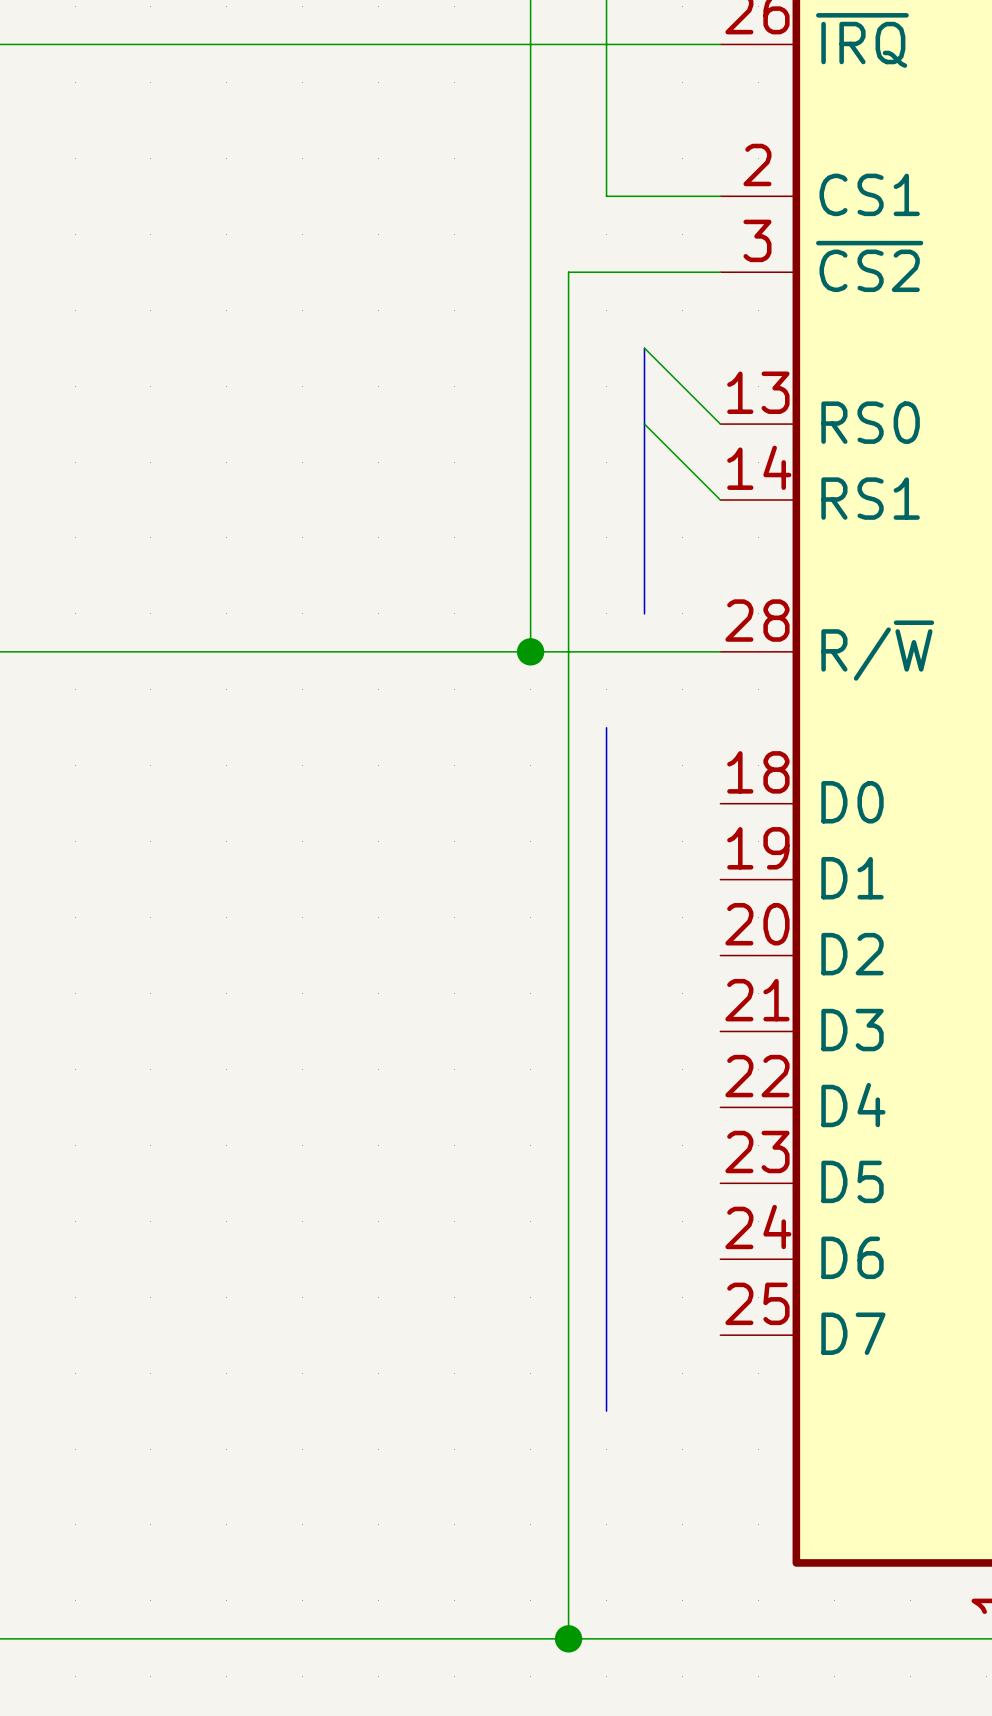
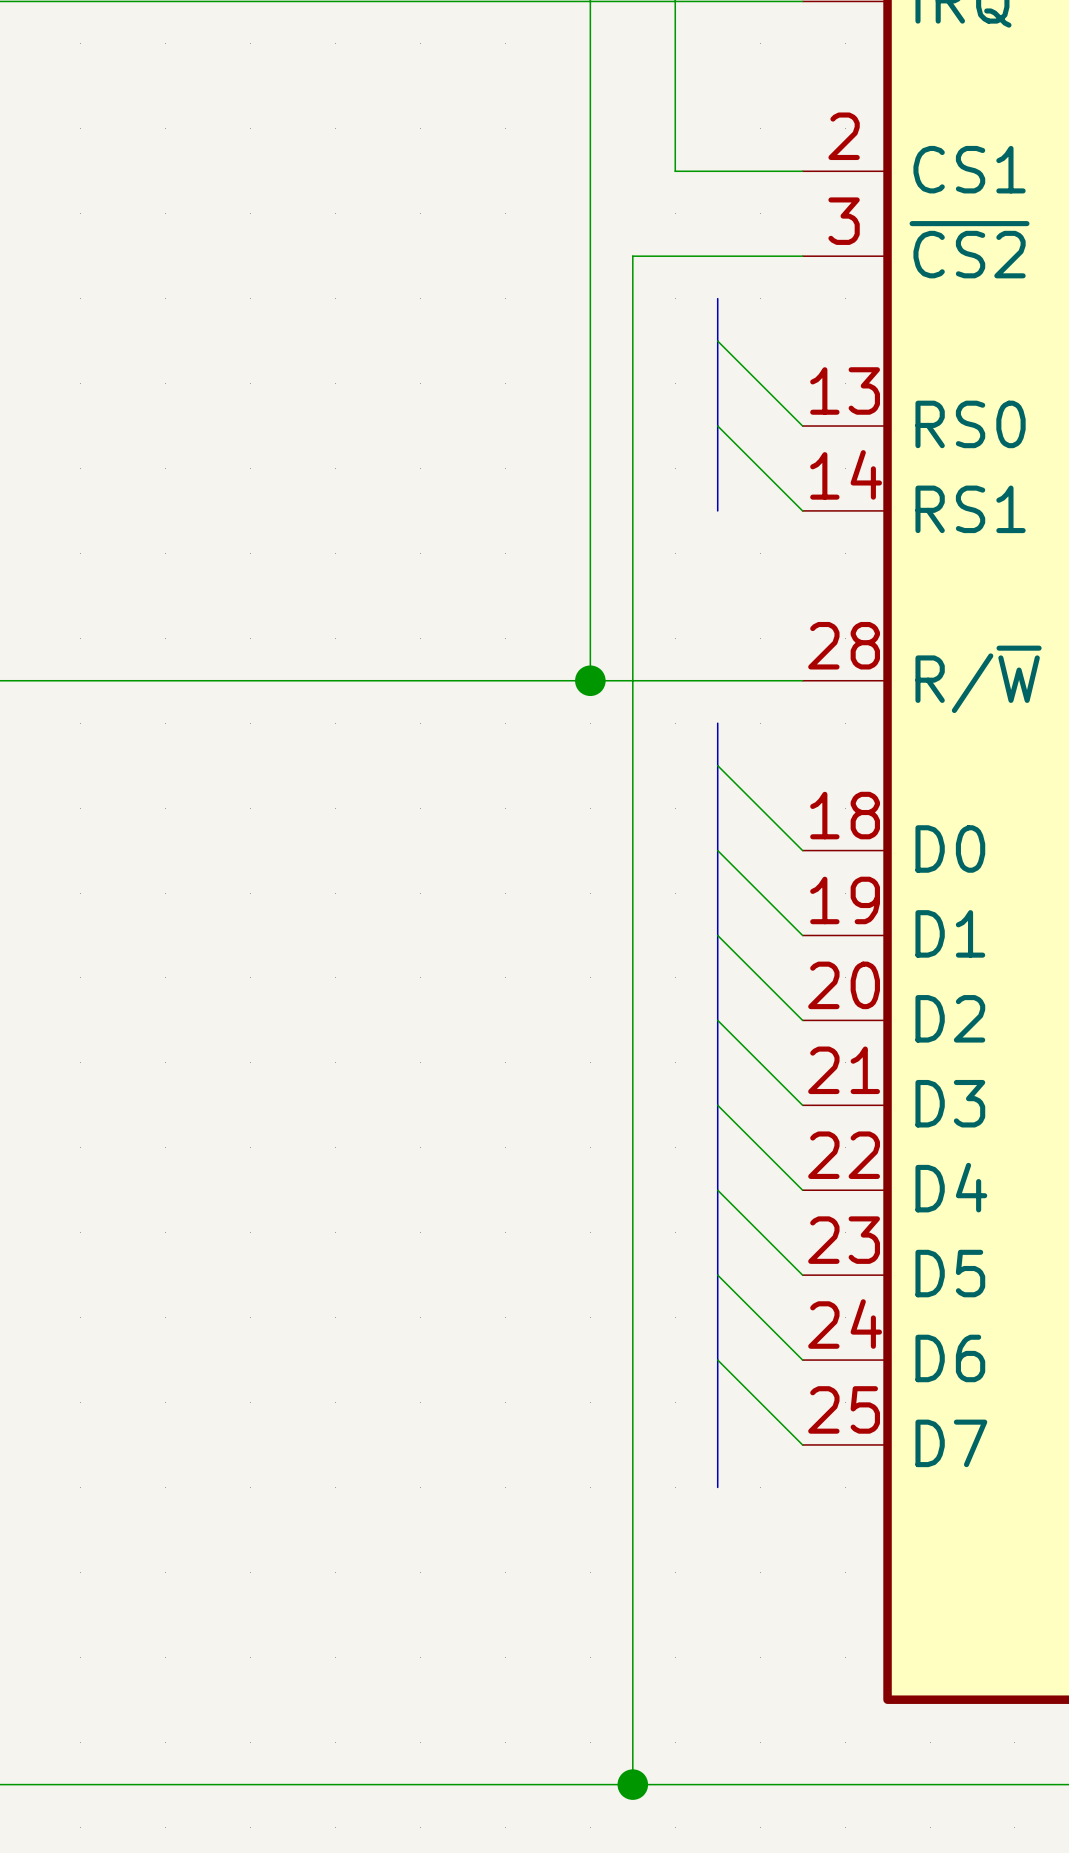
bus: none -> (717, 298) (717, 341)
bus: (644, 500) (644, 613) -> none
bus: (606, 727) (606, 1411) -> (717, 723) (717, 1487)
wire: none -> (717, 765) (802, 850)
wire: none -> (717, 850) (802, 935)
wire: none -> (717, 935) (802, 1020)
wire: none -> (717, 1020) (802, 1105)
wire: none -> (717, 1105) (802, 1190)
wire: none -> (717, 1190) (802, 1275)
wire: none -> (717, 1275) (802, 1360)
wire: none -> (717, 1360) (802, 1444)

